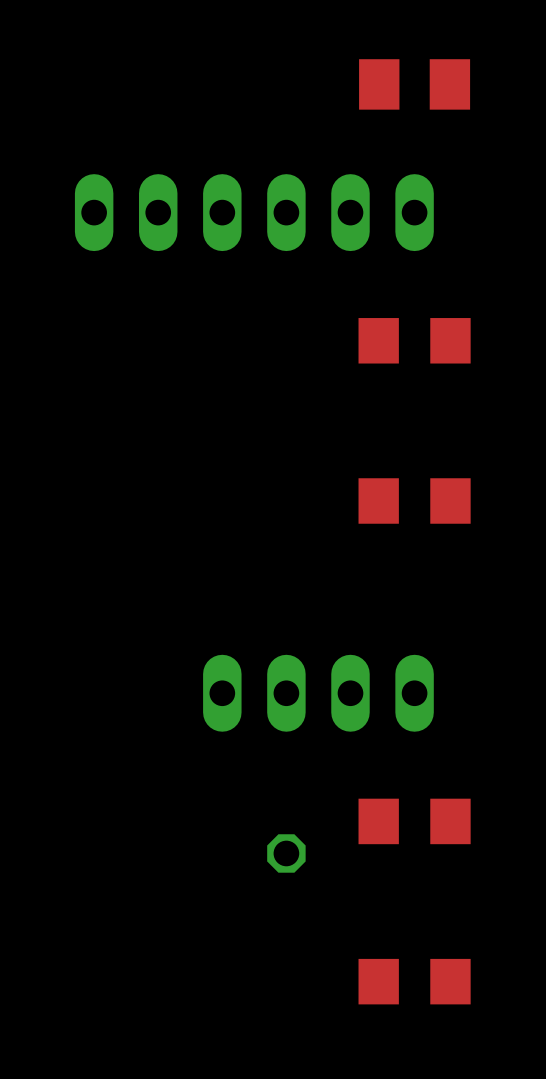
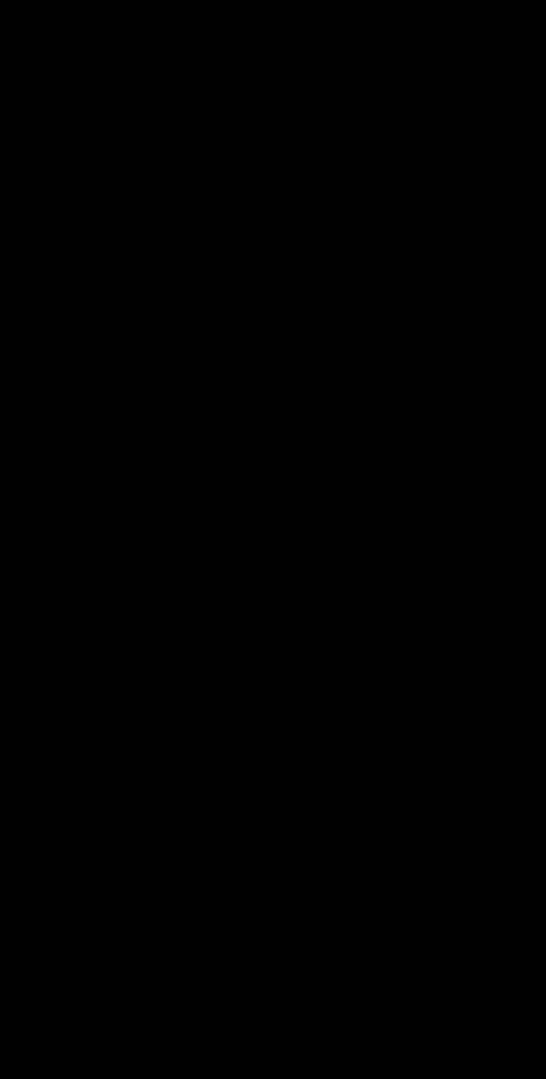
part: (414, 84) -> none
part: (254, 212) -> none
part: (414, 340) -> none
part: (414, 500) -> none
part: (318, 693) -> none
part: (414, 821) -> none
part: (286, 853) -> none
part: (414, 981) -> none

